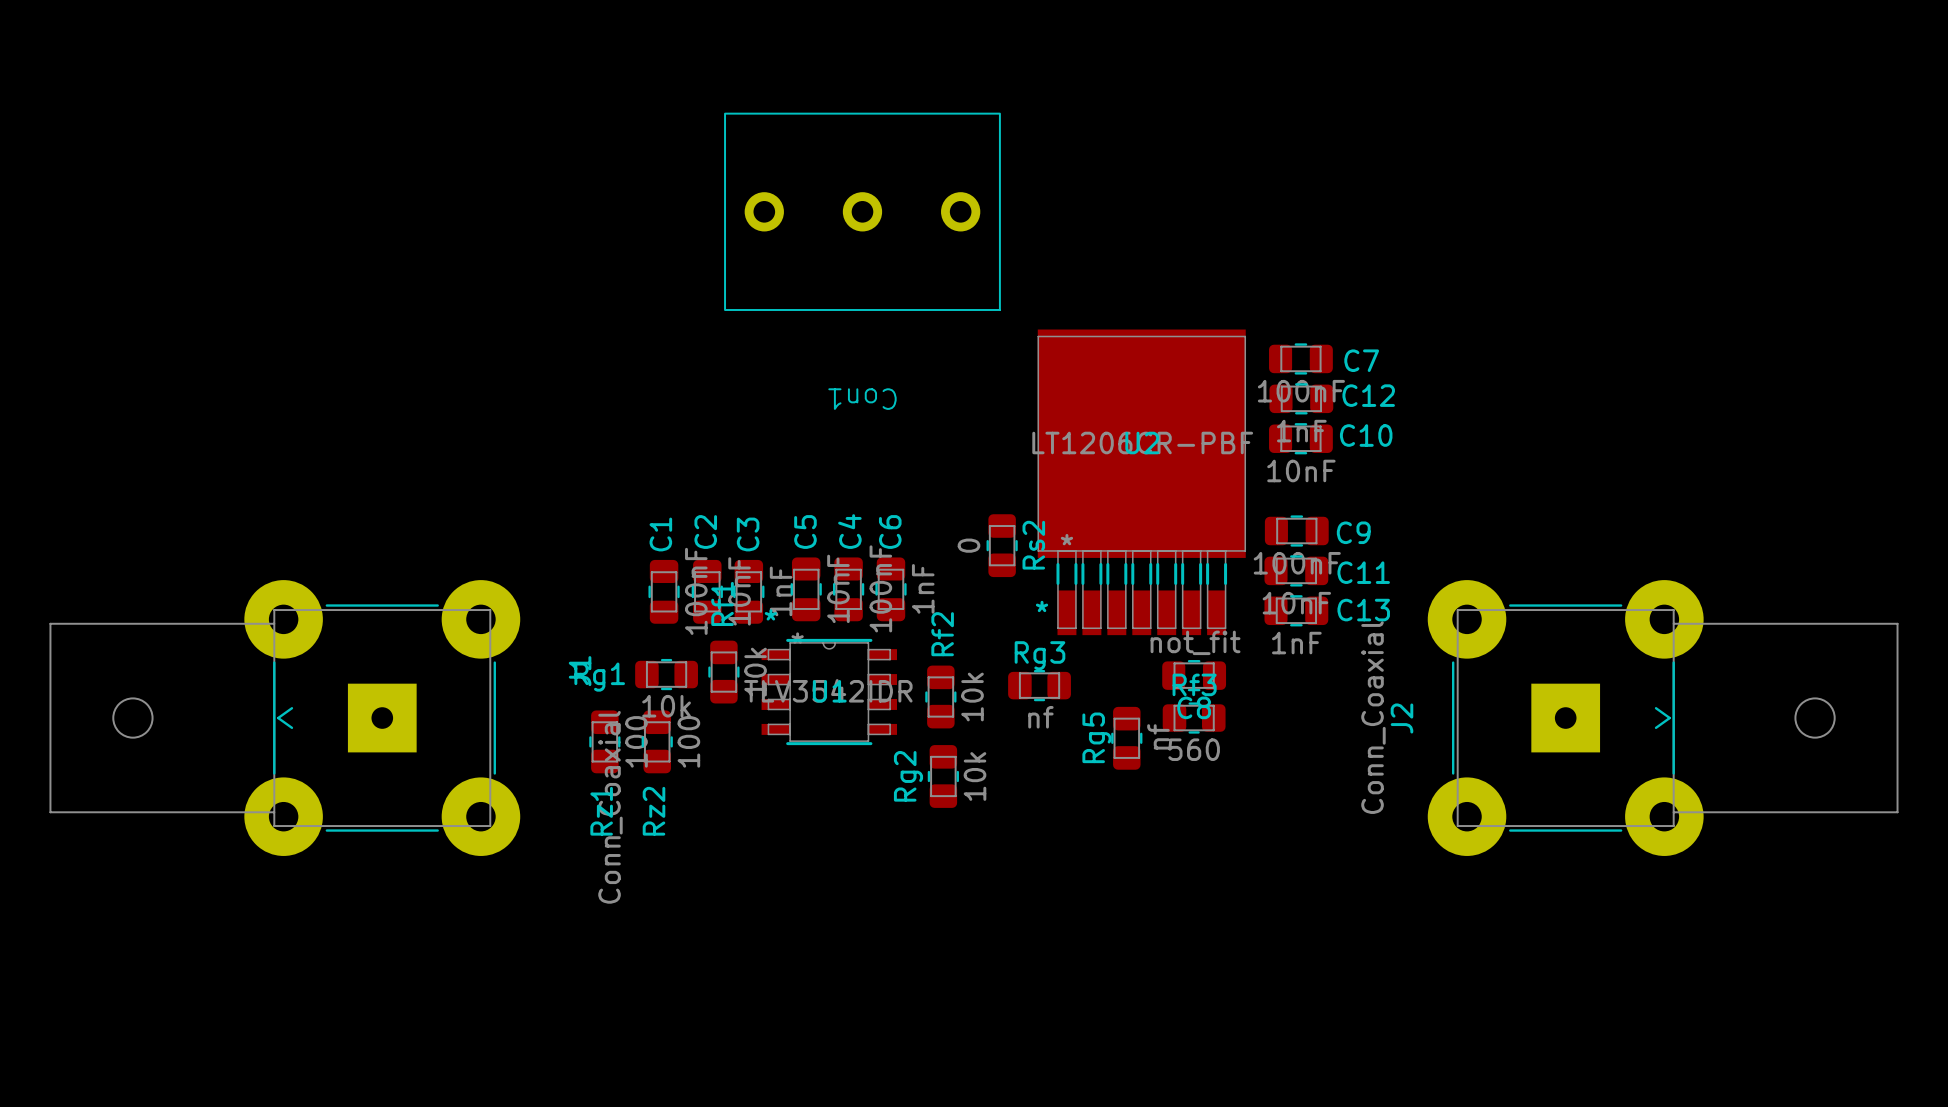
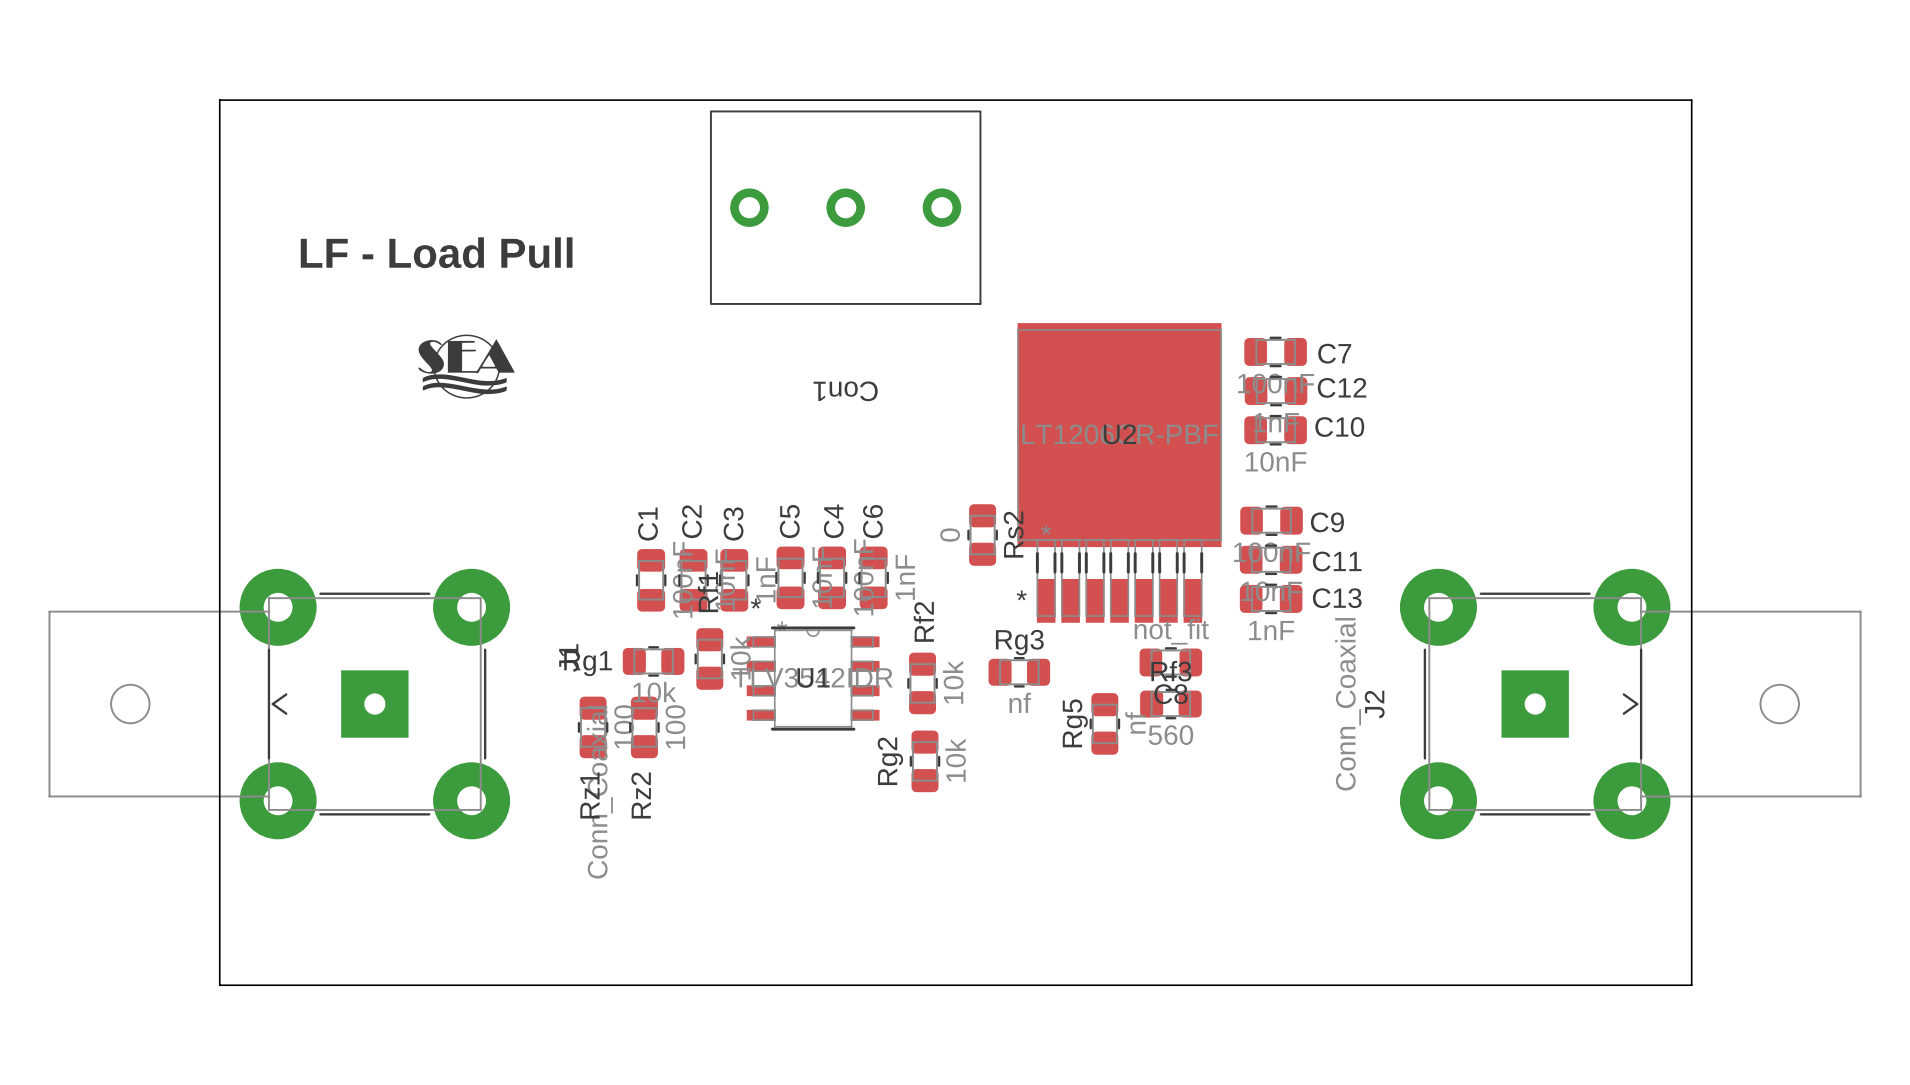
board edge: none -> (219, 100) (1691, 100) (1691, 985) (219, 985) (219, 100)
text: none -> LF - Load Pull (436, 252)
drawing: none -> [418, 334, 515, 399]

